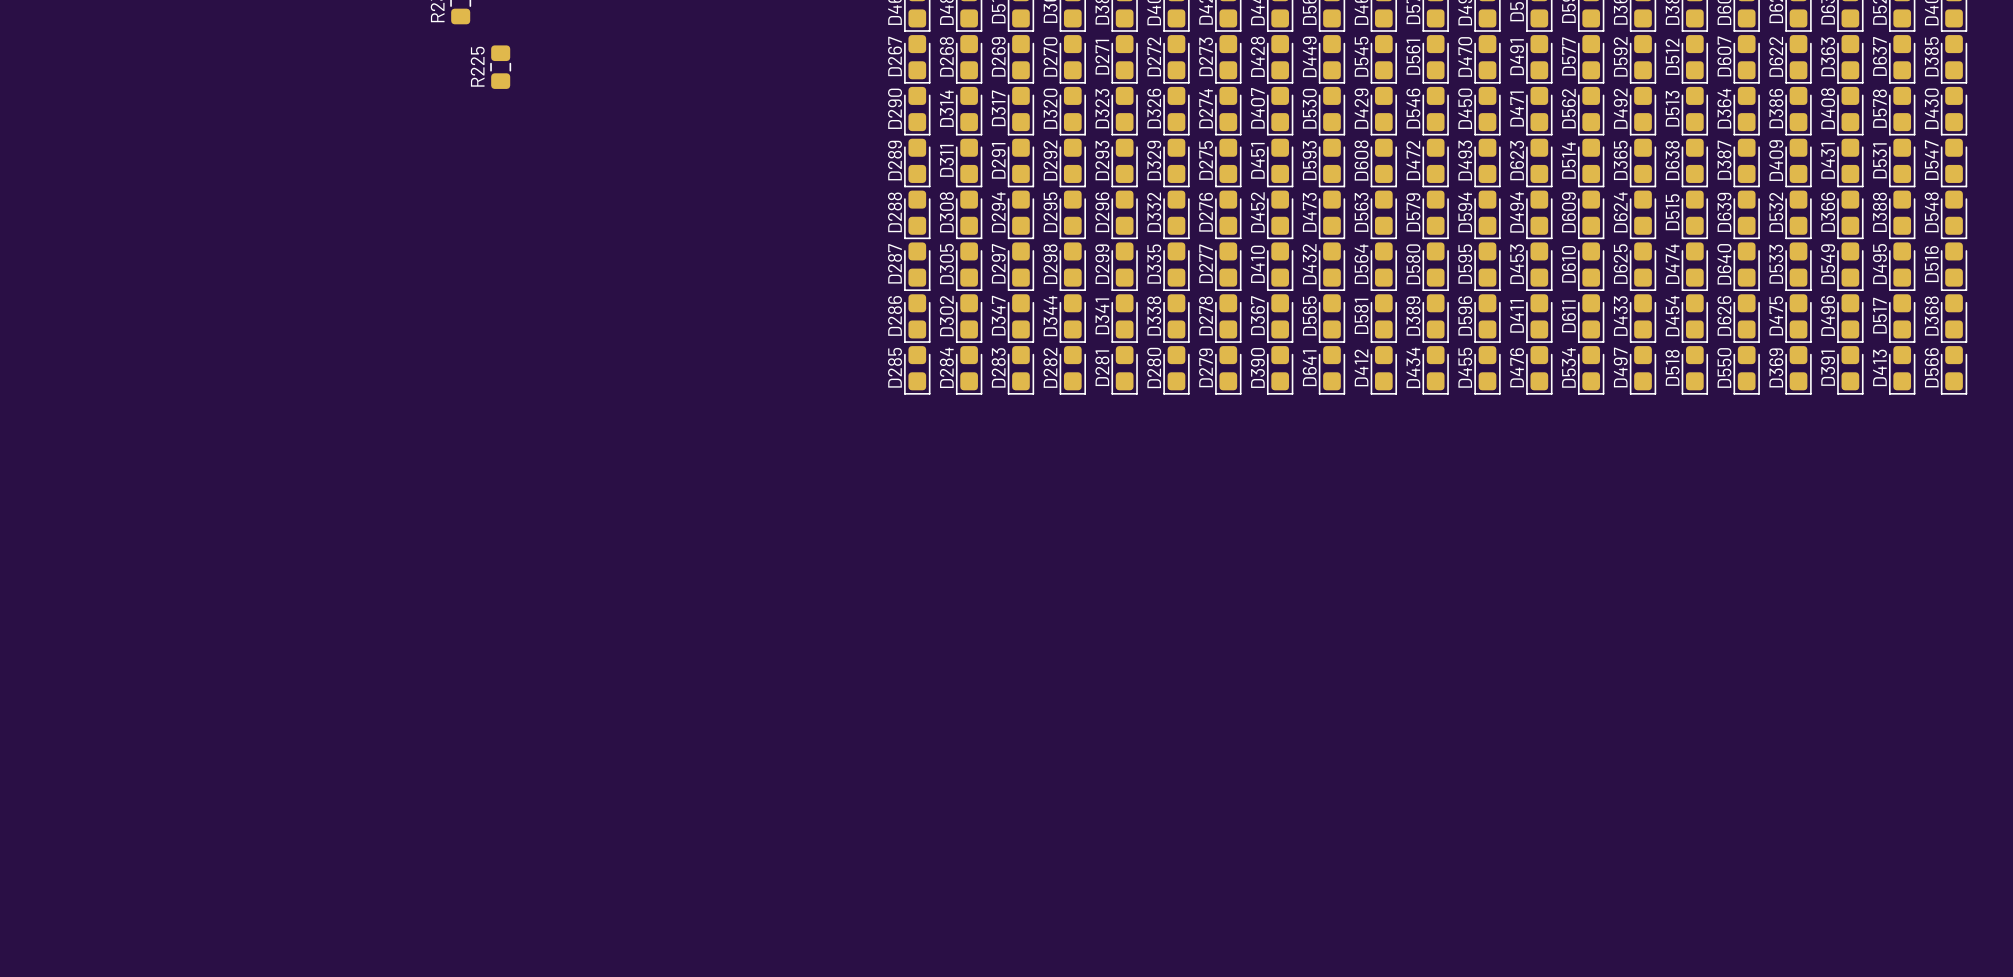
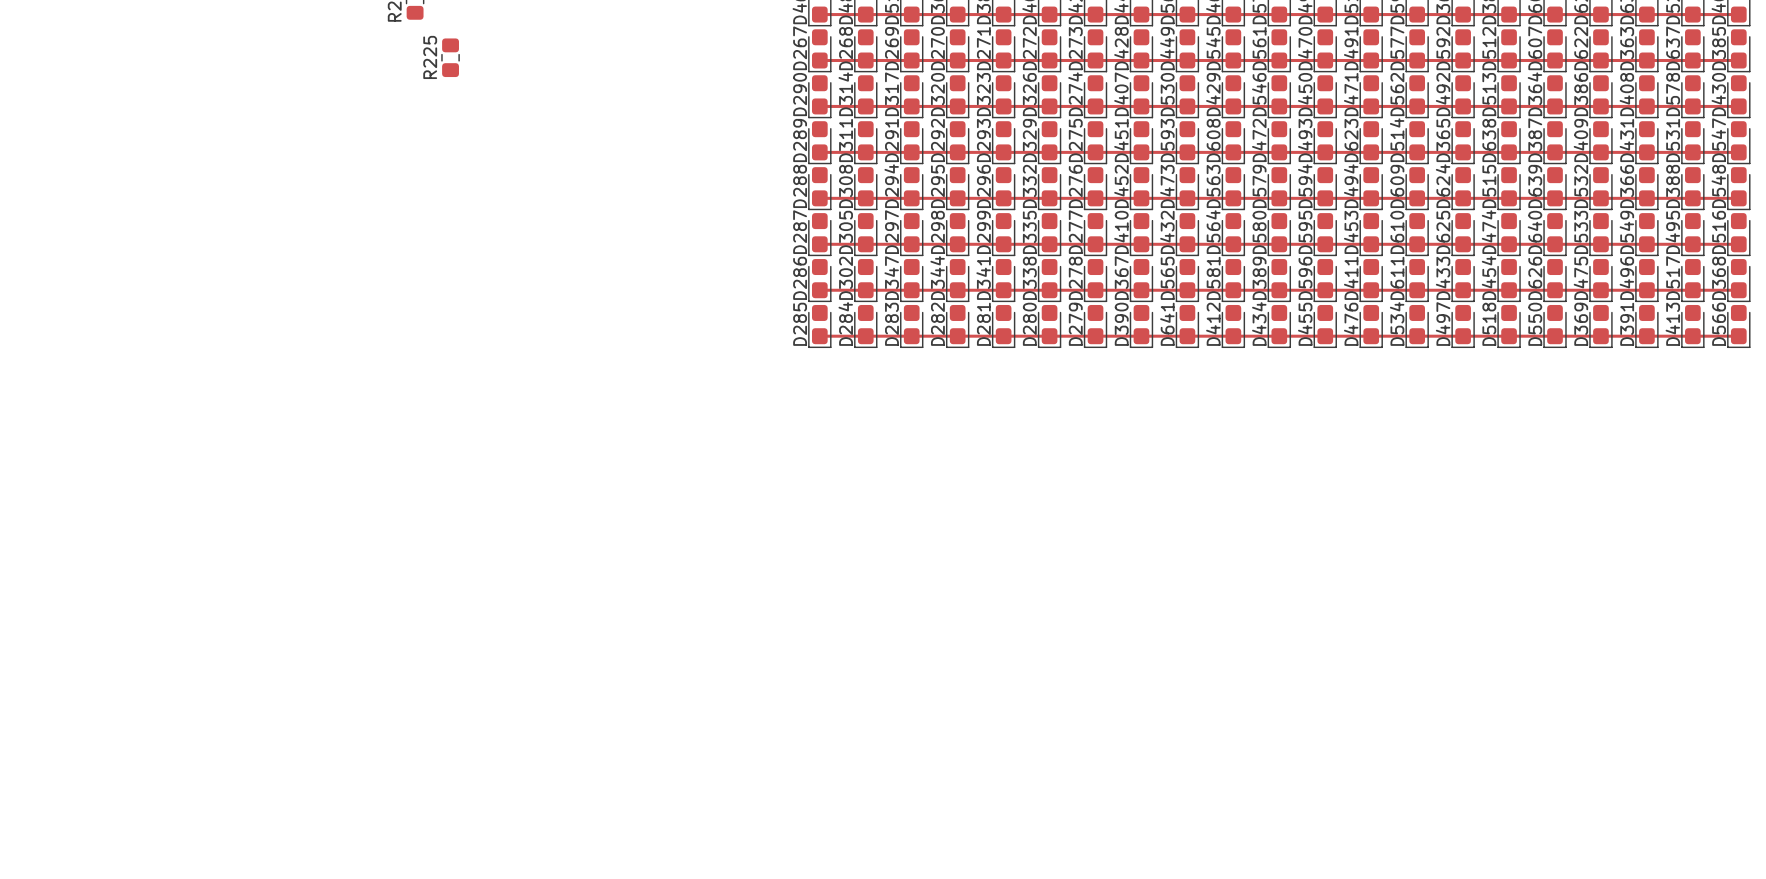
track: none -> (819, 14) (1738, 14)
track: none -> (819, 60) (1738, 60)
track: none -> (819, 106) (1738, 106)
track: none -> (819, 152) (1738, 152)
track: none -> (819, 198) (1738, 198)
track: none -> (819, 244) (1738, 244)
track: none -> (819, 290) (1738, 290)
track: none -> (819, 336) (1738, 336)

